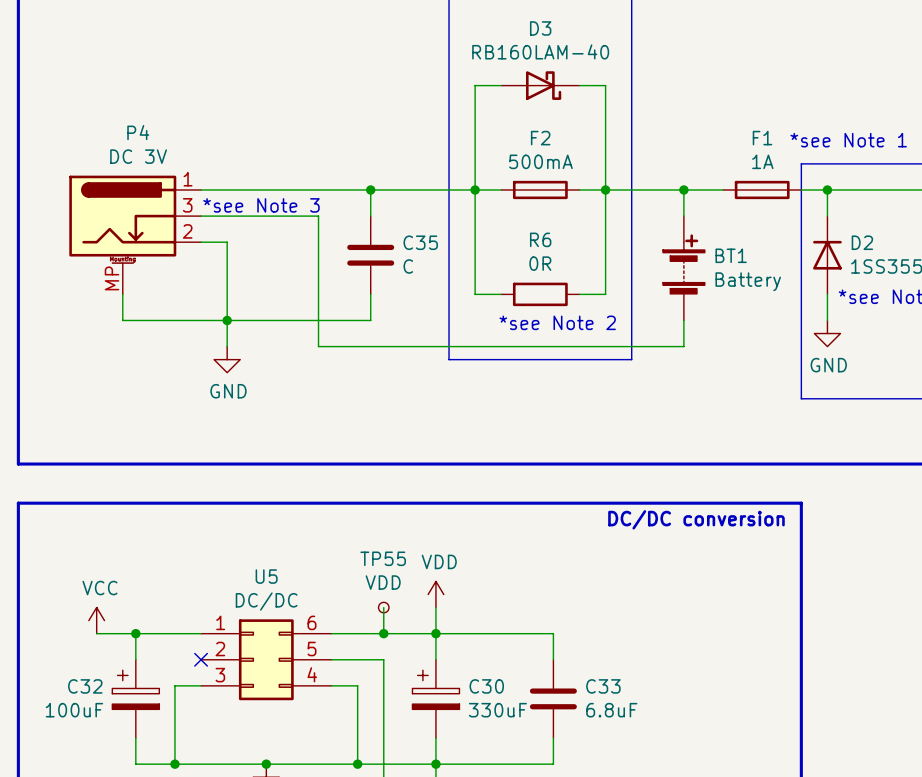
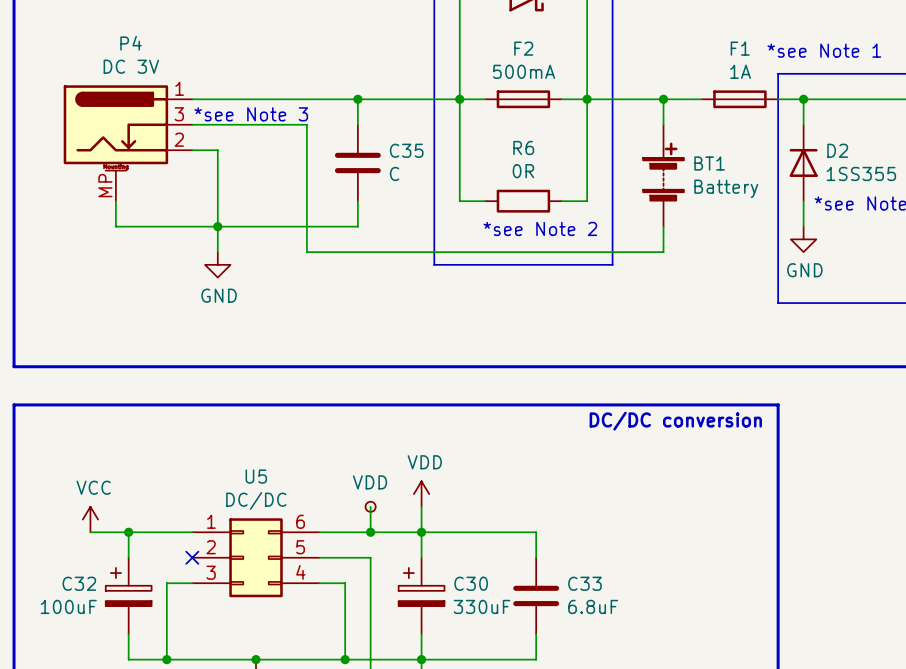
TP55 name: TP55 (383, 558) -> none

